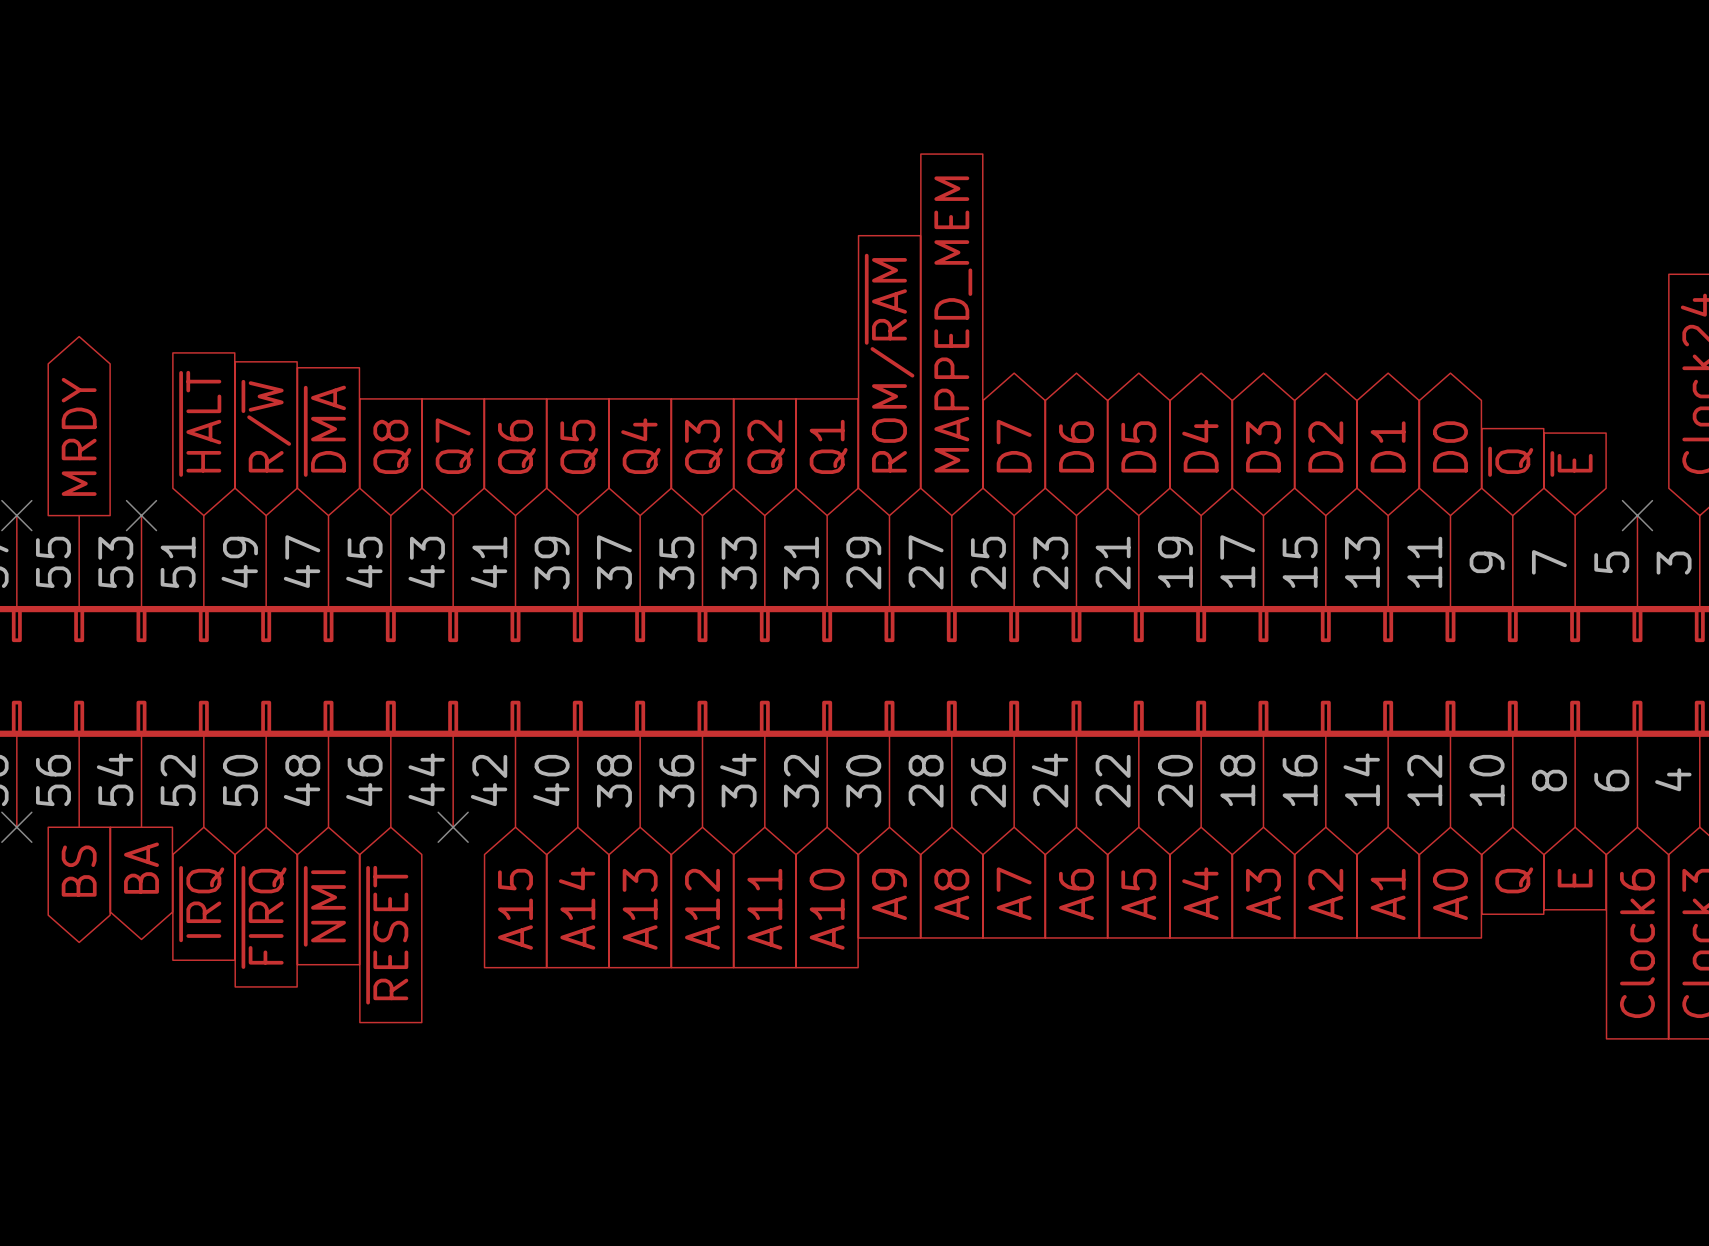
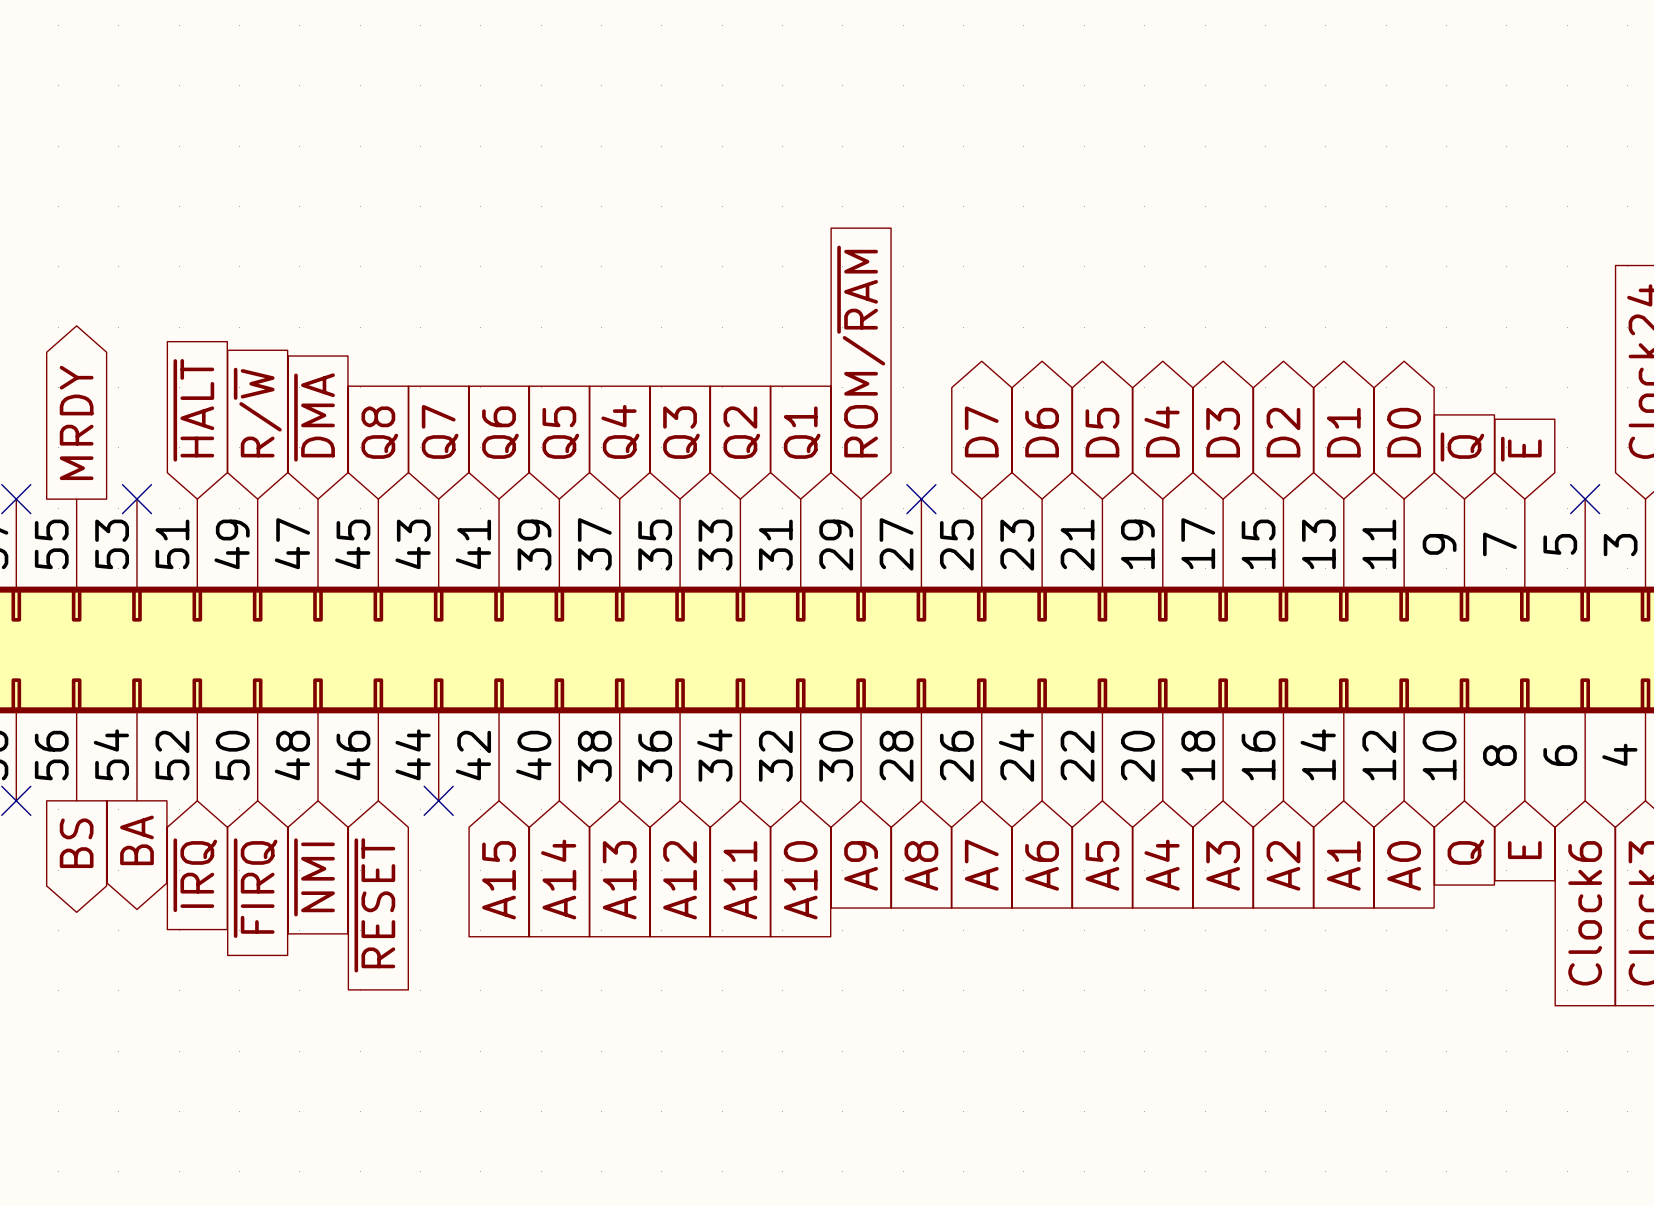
global label: MAPPED_MEM (953, 324) -> none
no-connect mark: none -> (921, 499)

